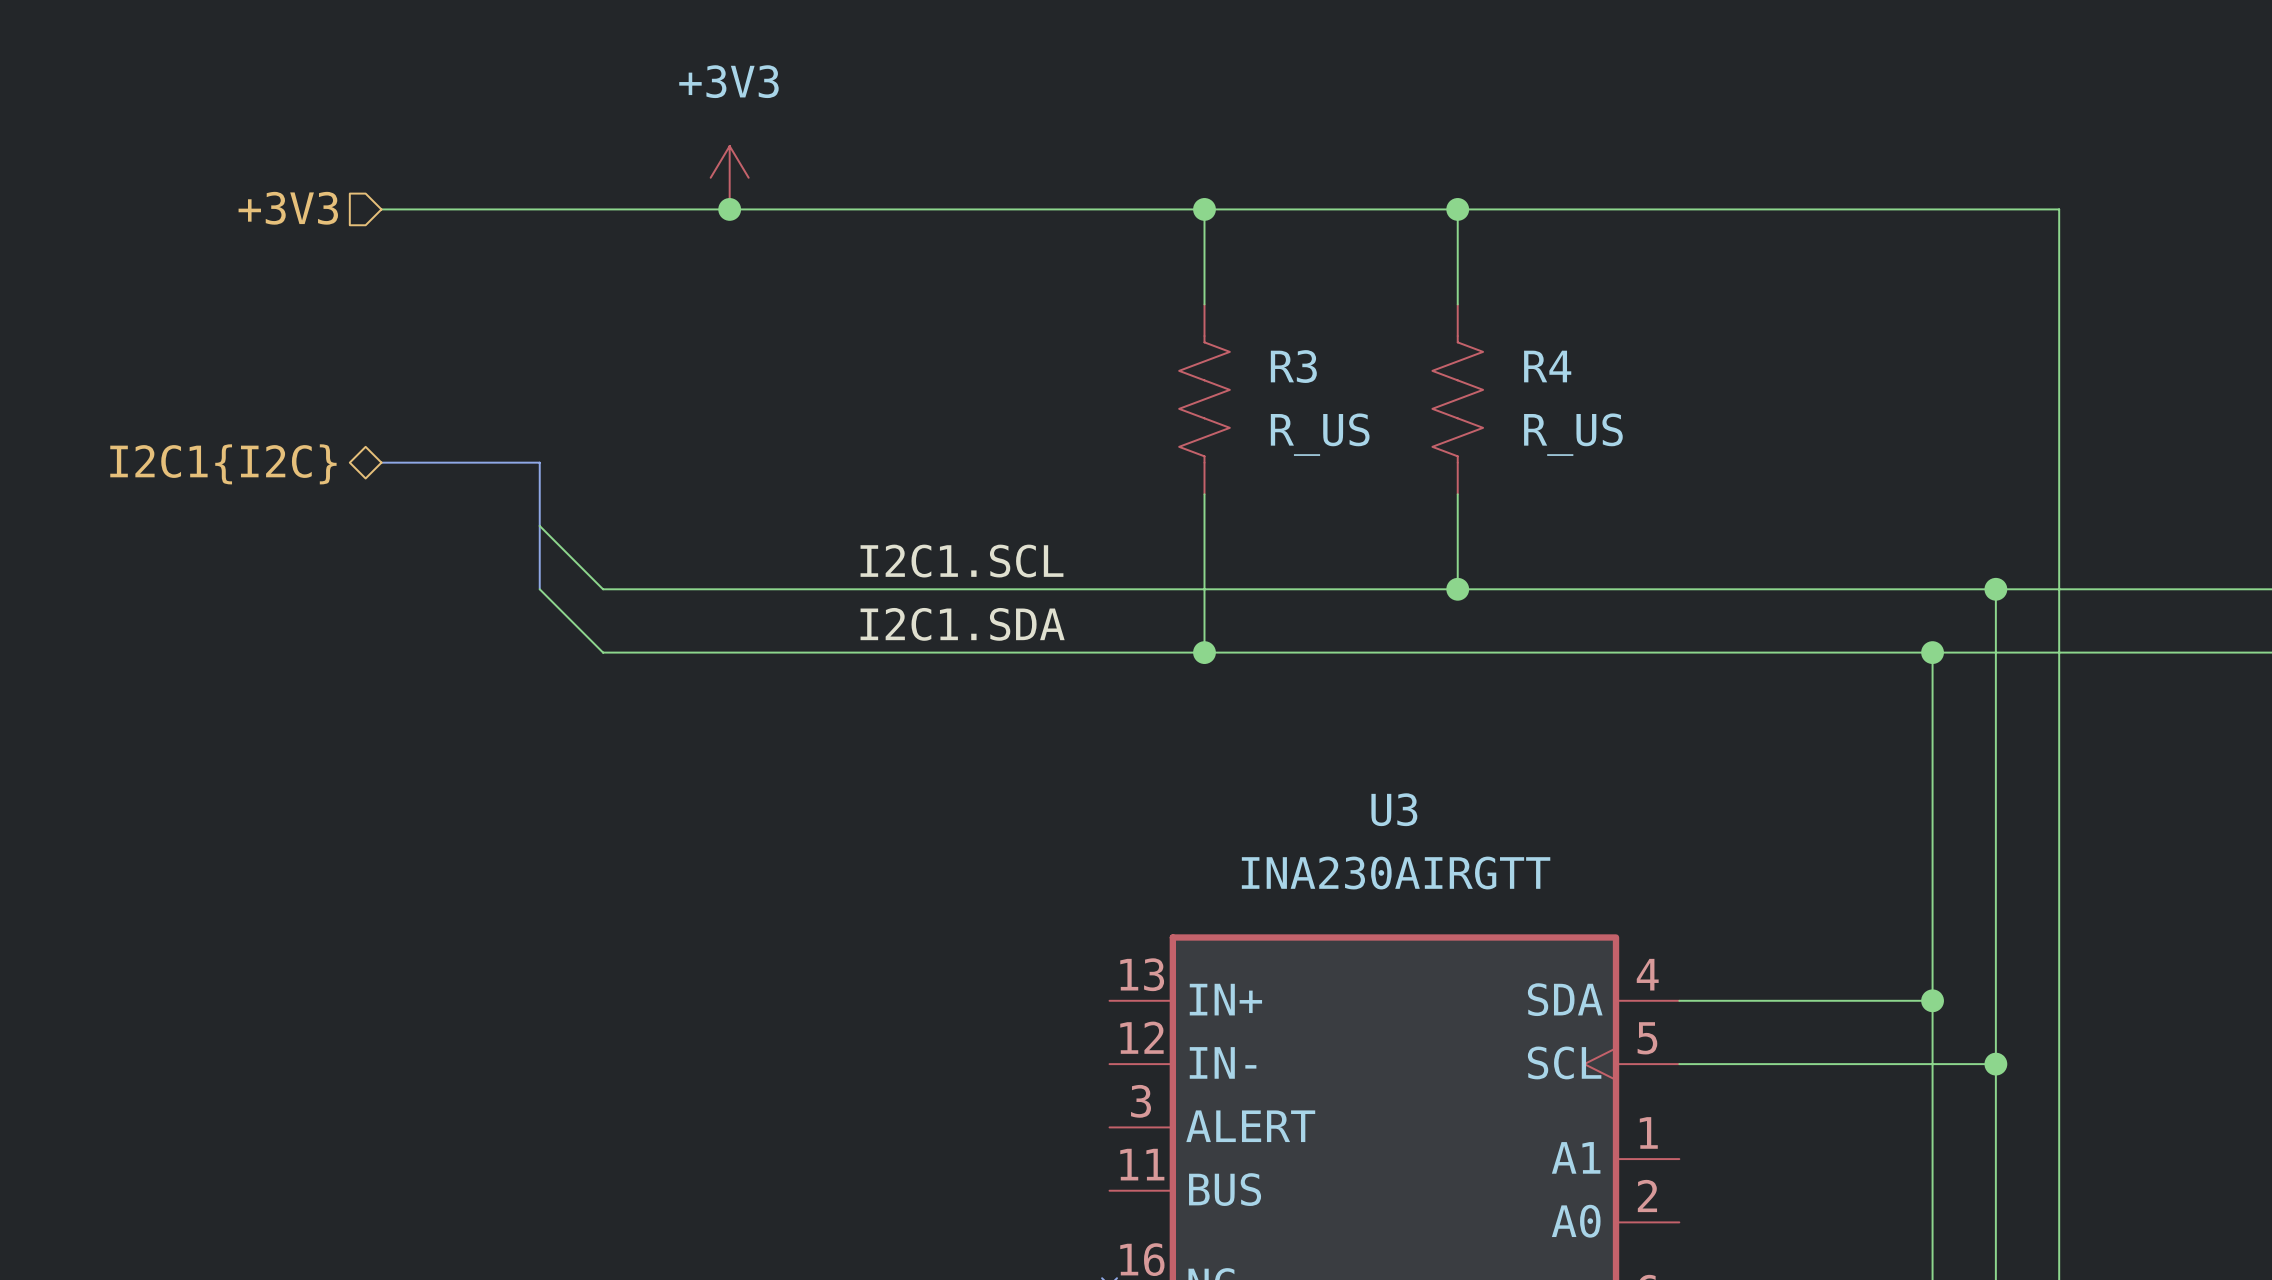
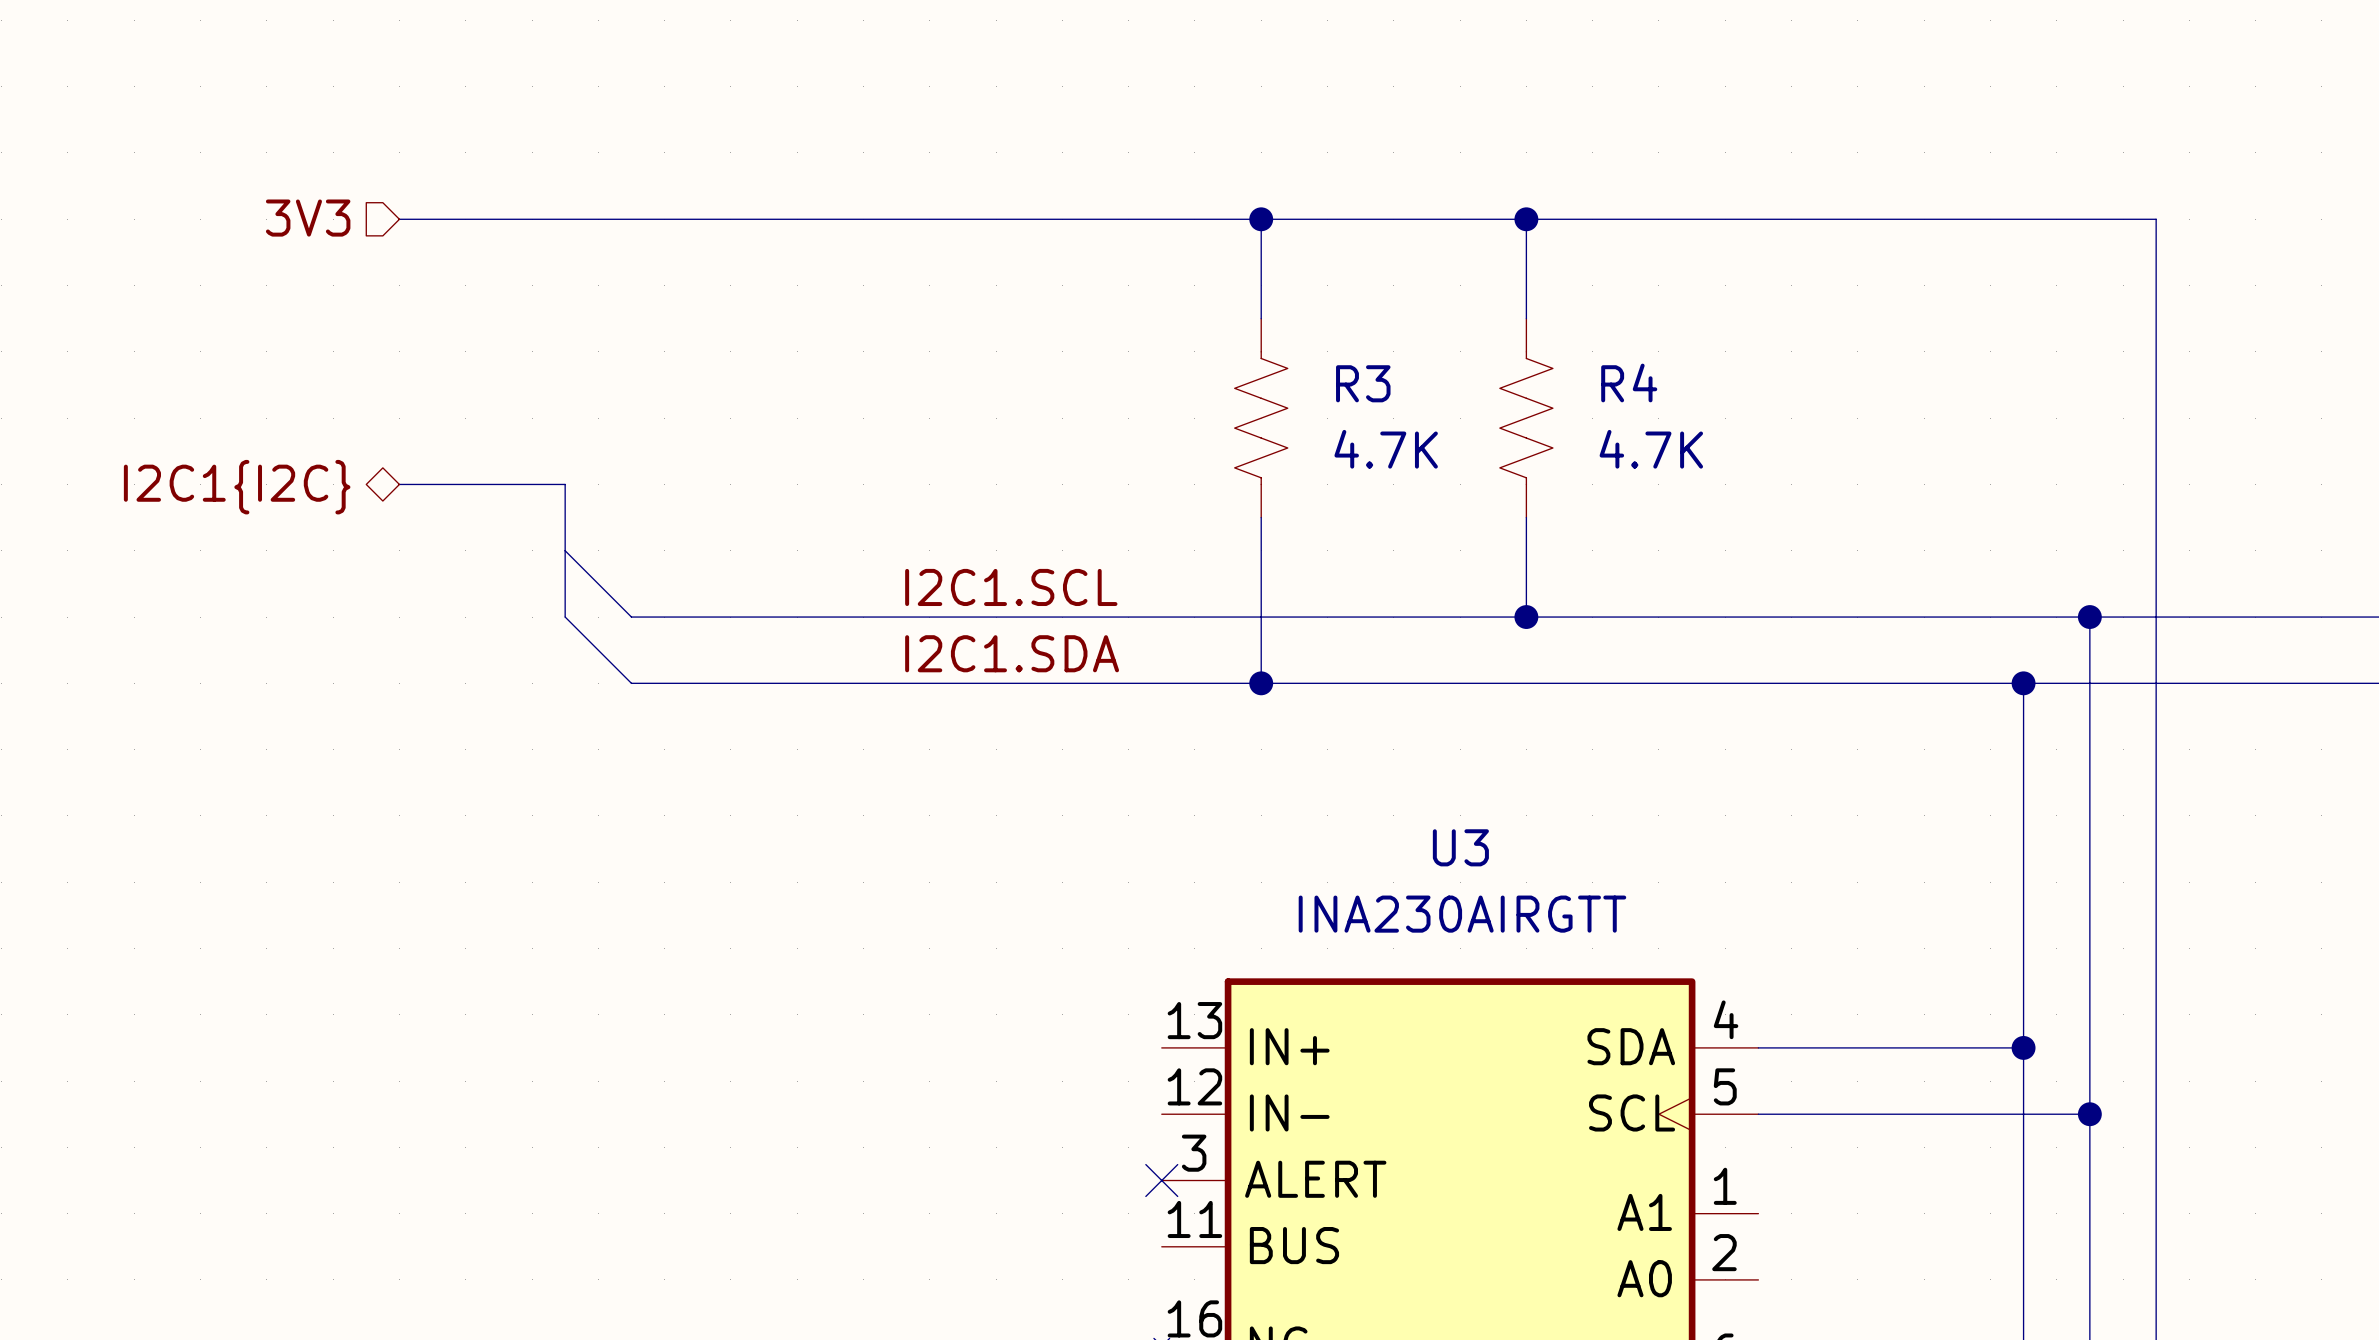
power symbol: +3V3 (729, 177) -> none
hierarchical label: +3V3 (288, 208) -> 3V3 (308, 218)
junction: (729, 209) -> none
R3 value: R_US (1320, 434) -> 4.7K (1386, 449)
R4 value: R_US (1573, 434) -> 4.7K (1651, 449)
no-connect mark: none -> (1161, 1180)

